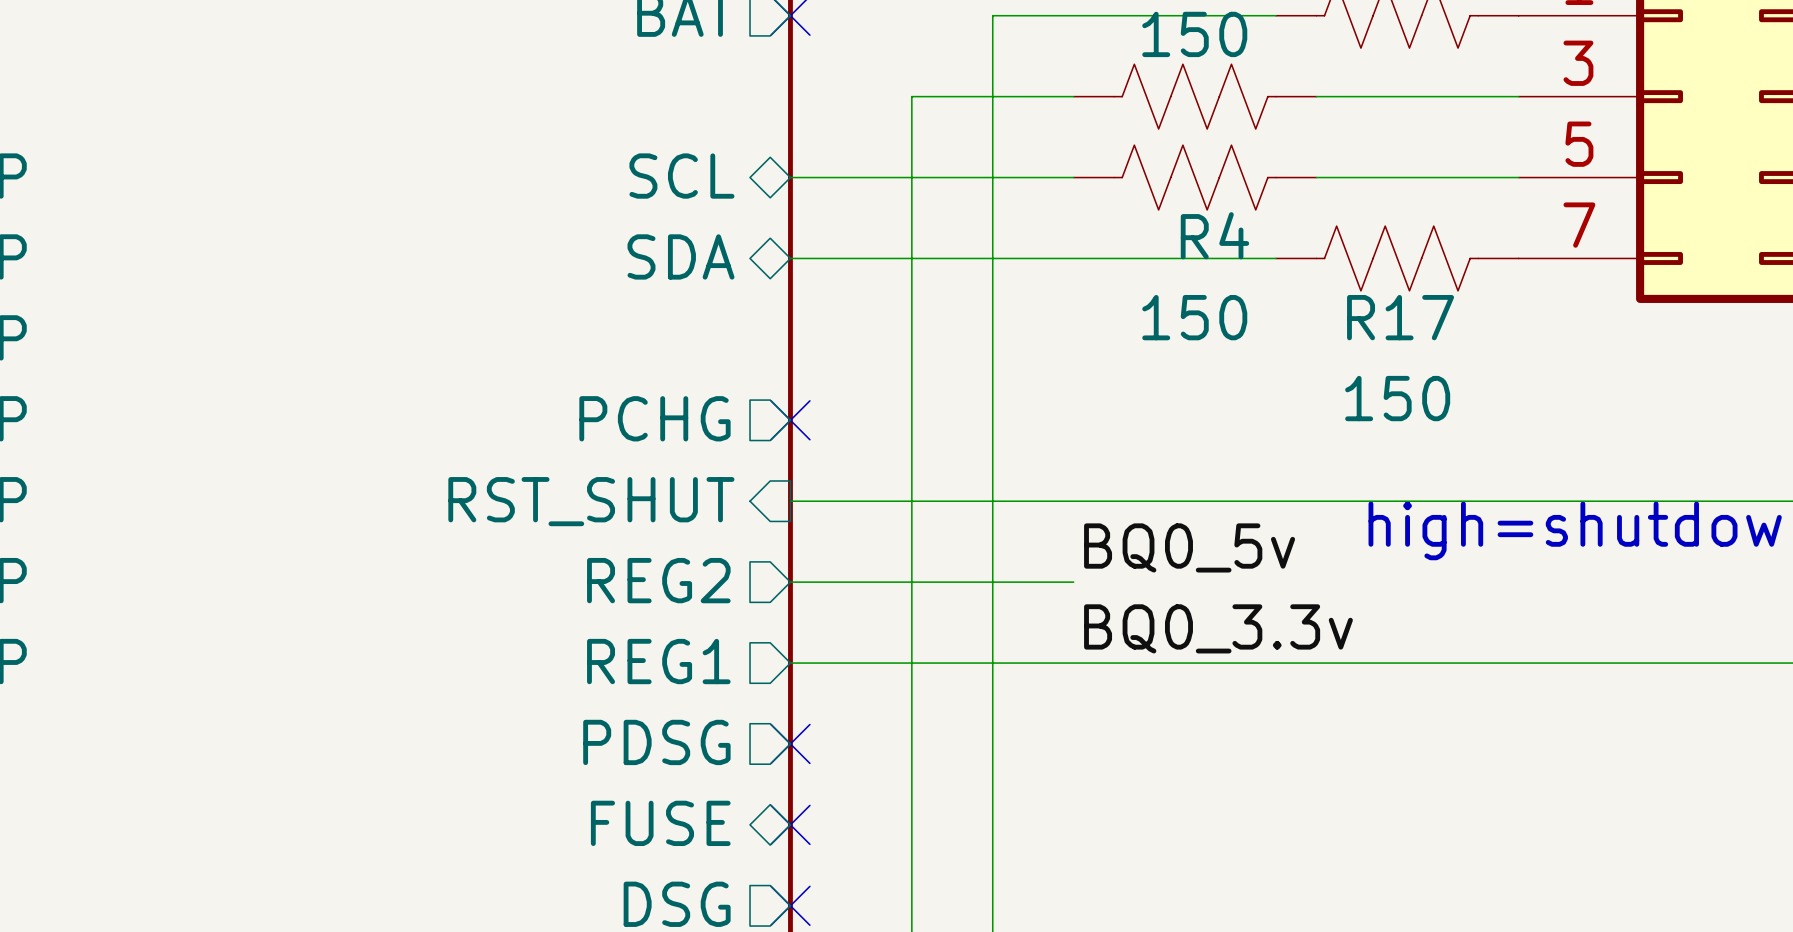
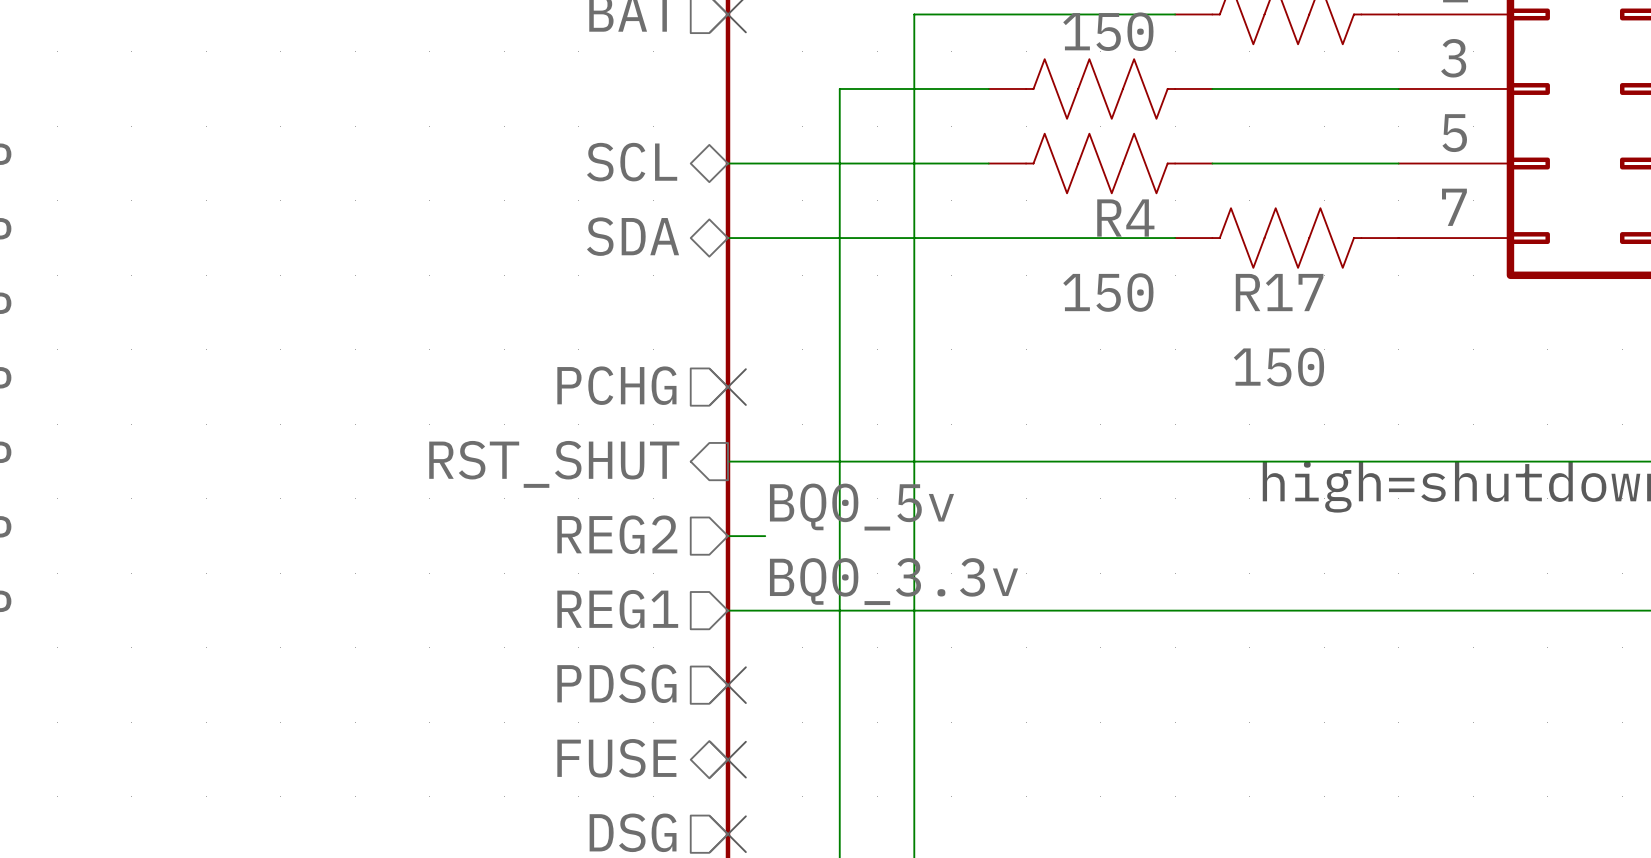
label position: BQ0_5v (1189, 547) -> BQ0_5v (861, 507)
wire: (830, 582) (1073, 582) -> none
label position: BQ0_3.3v (1218, 628) -> BQ0_3.3v (894, 581)

